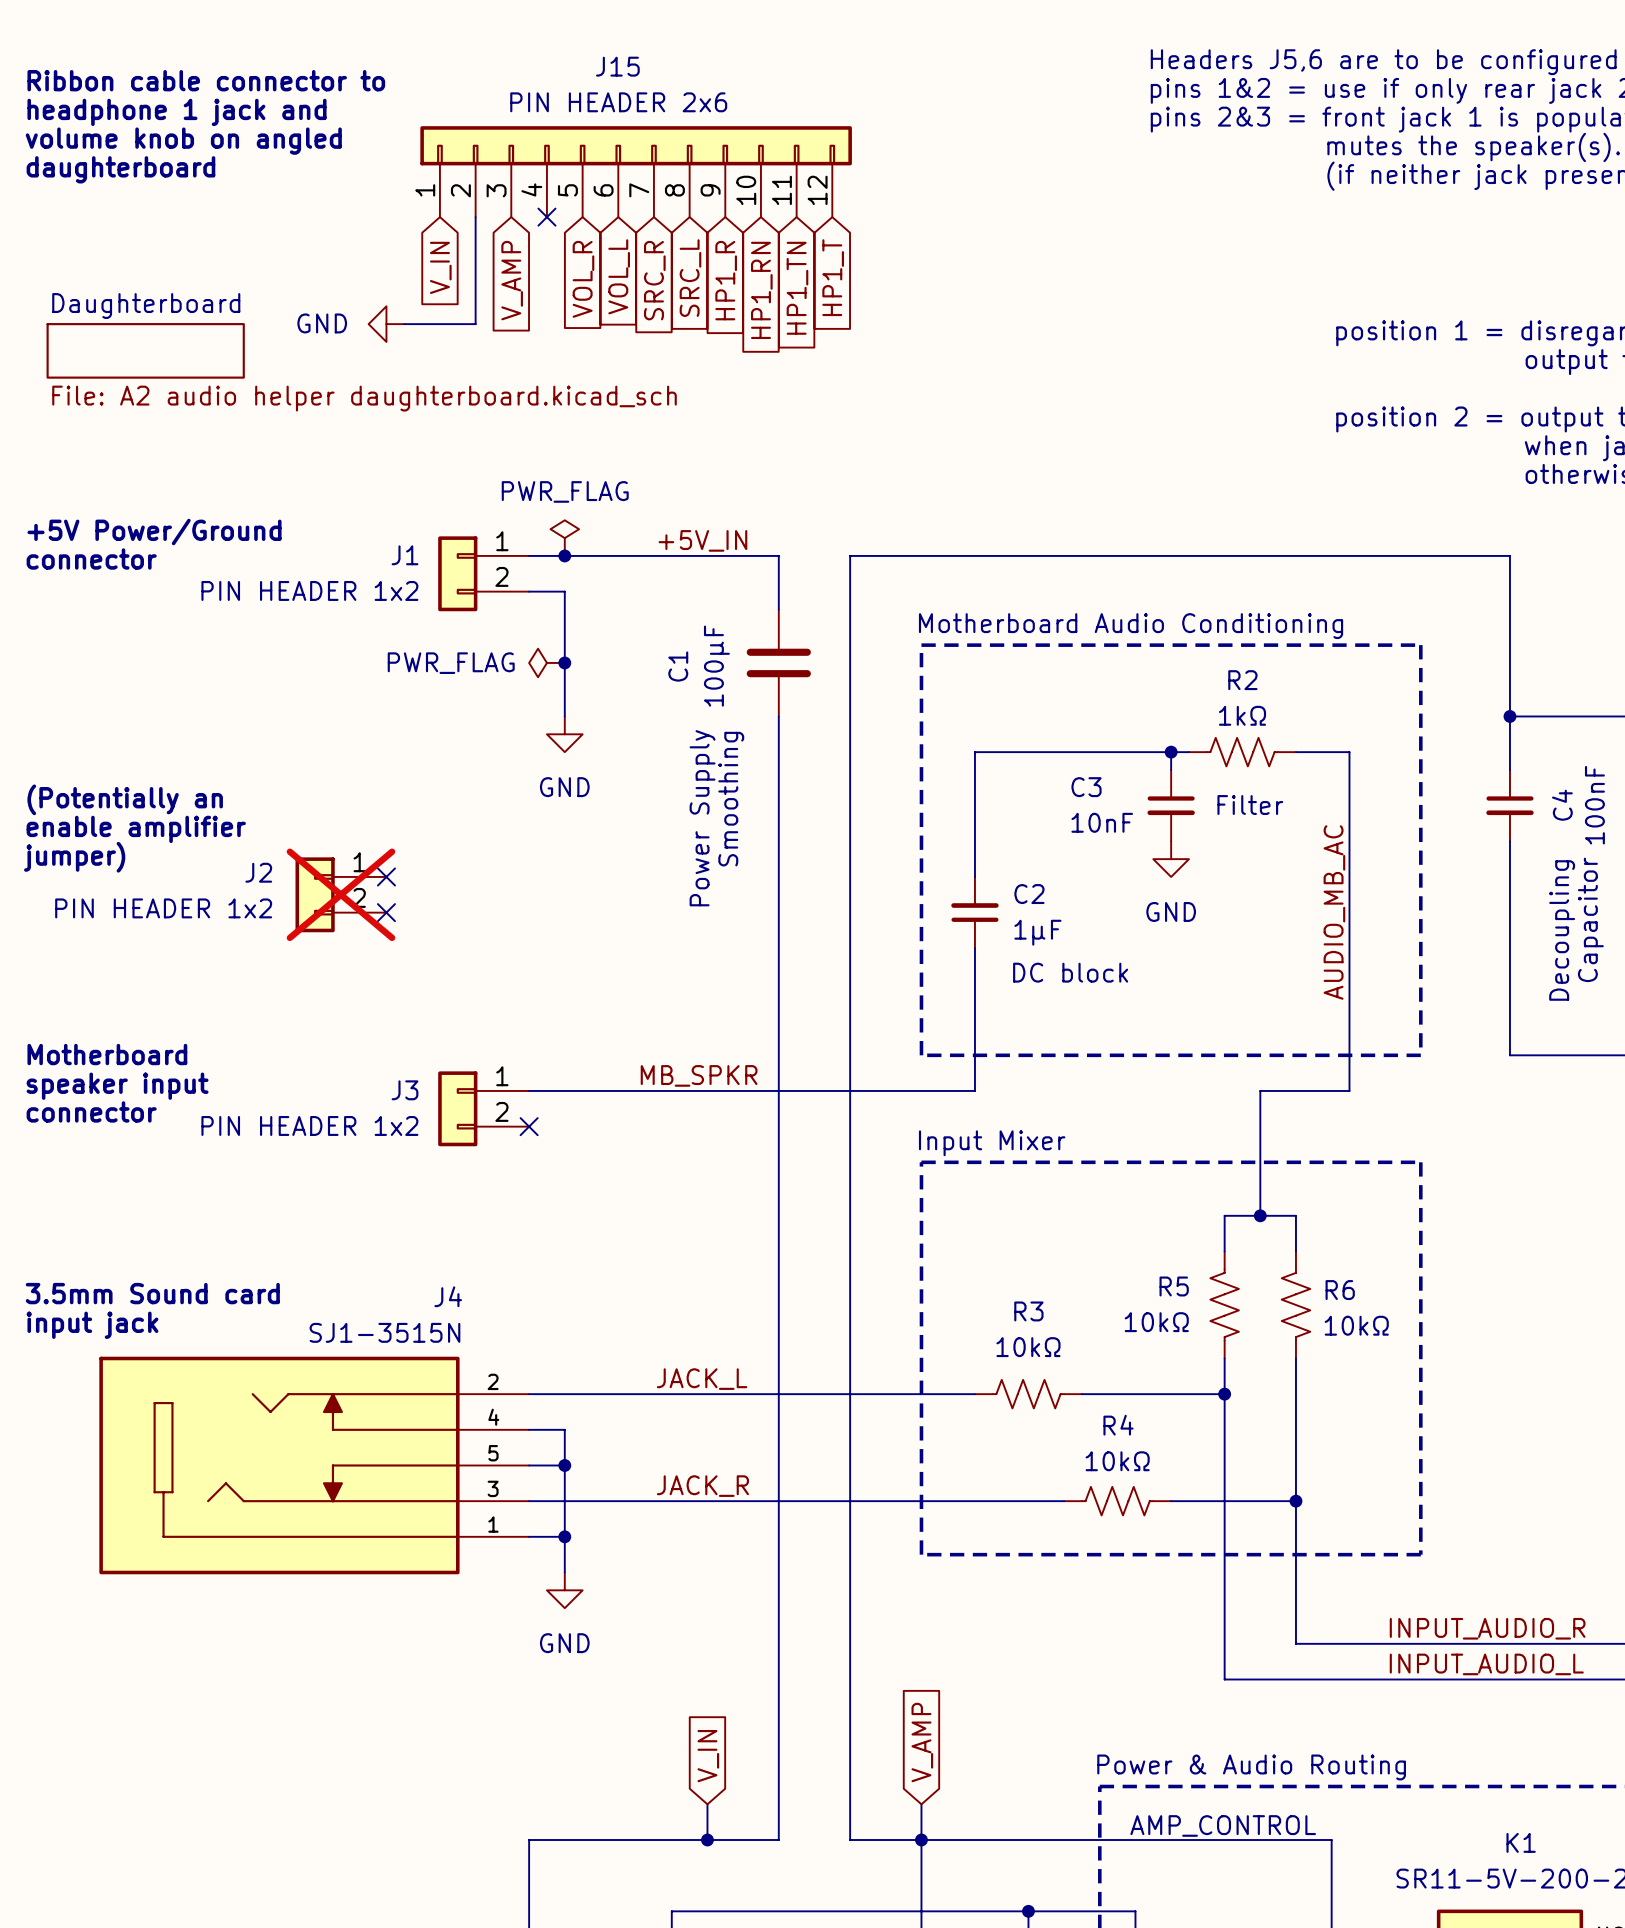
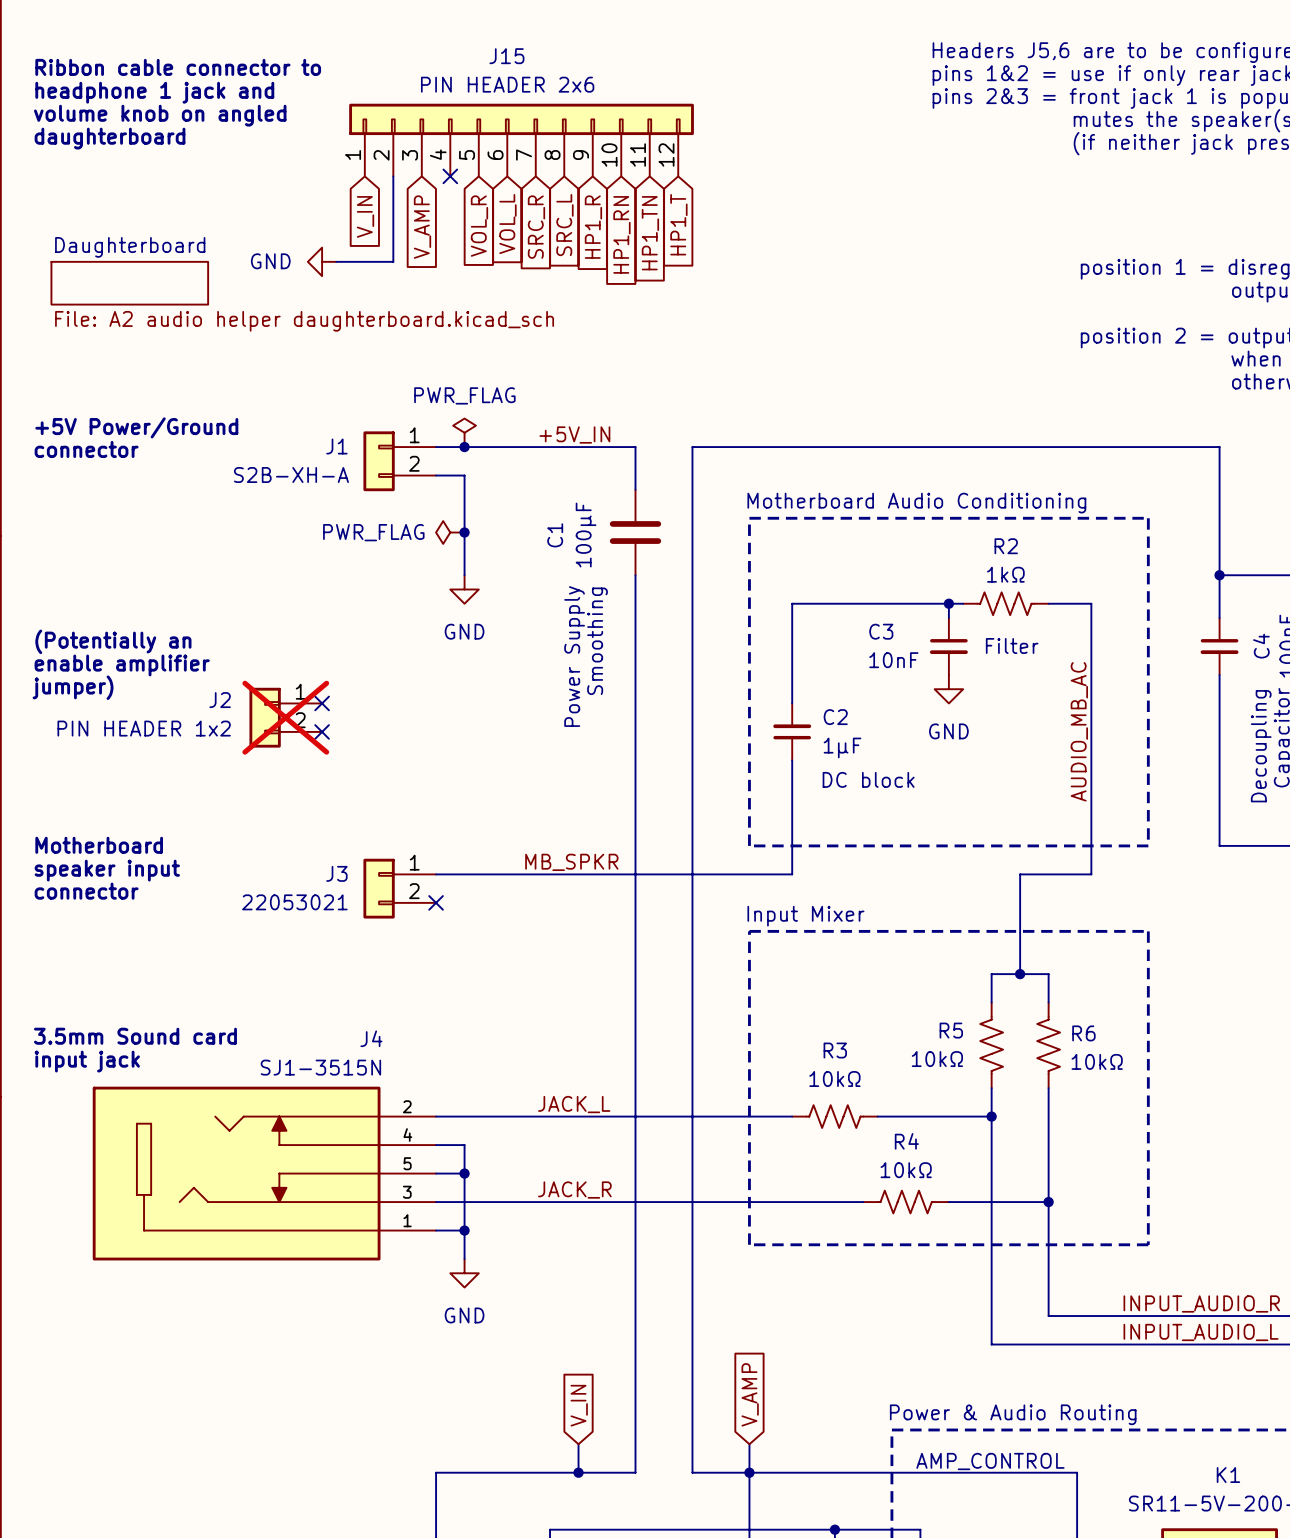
J1 value: PIN HEADER 1x2 (309, 590) -> S2B-XH-A (291, 475)
J3 value: PIN HEADER 1x2 (309, 1125) -> 22053021 (294, 902)

